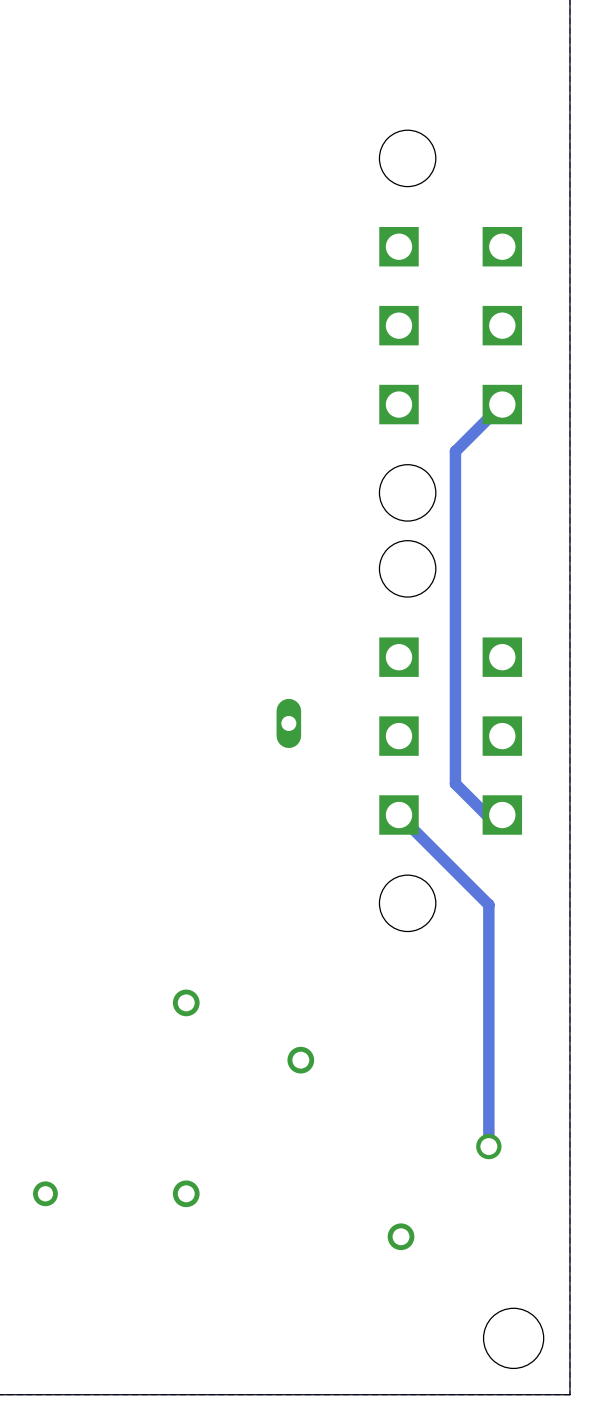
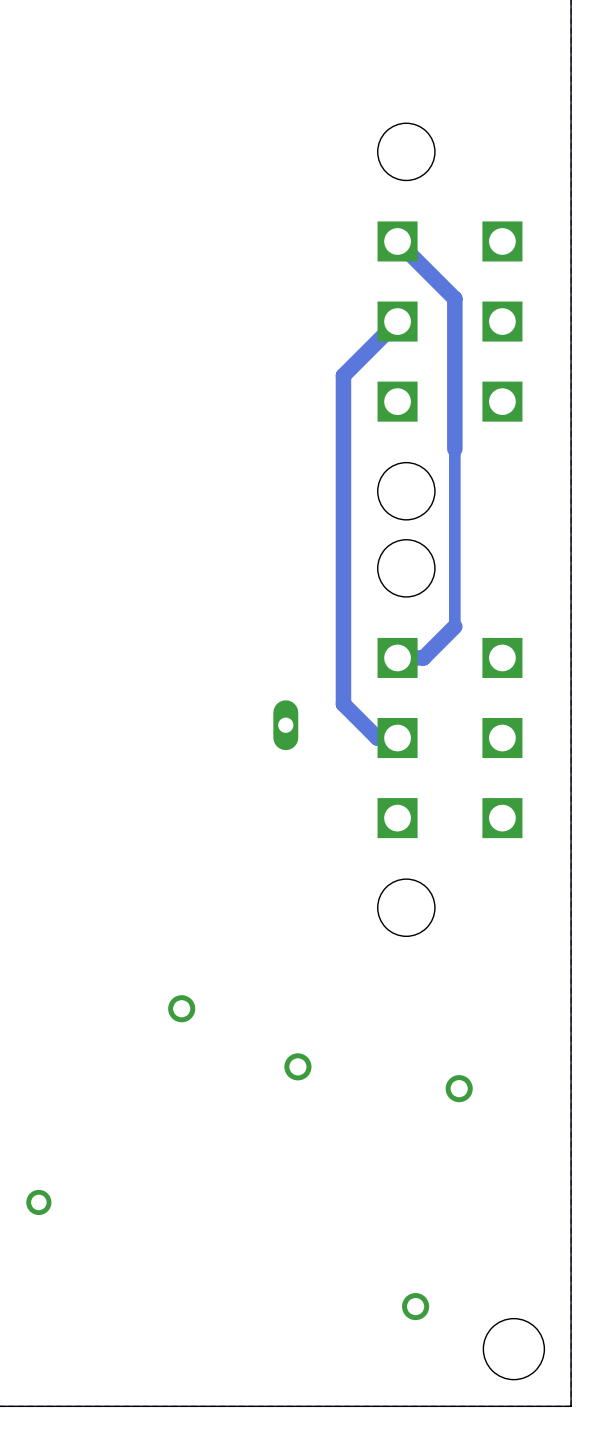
track: none -> (397, 321) (343, 375) (343, 704) (377, 738) (397, 738)
track: (502, 404) (455, 451) -> (397, 241) (454, 298) (454, 449)
track: (455, 626) (455, 783) (486, 815) (502, 815) -> (454, 626) (423, 657) (397, 657)
track: (398, 815) (488, 904) (488, 1146) -> none
via: none -> (459, 1088)
via: (488, 1146) -> none
via: (186, 1193) -> none
via position: (401, 1236) -> (415, 1306)

